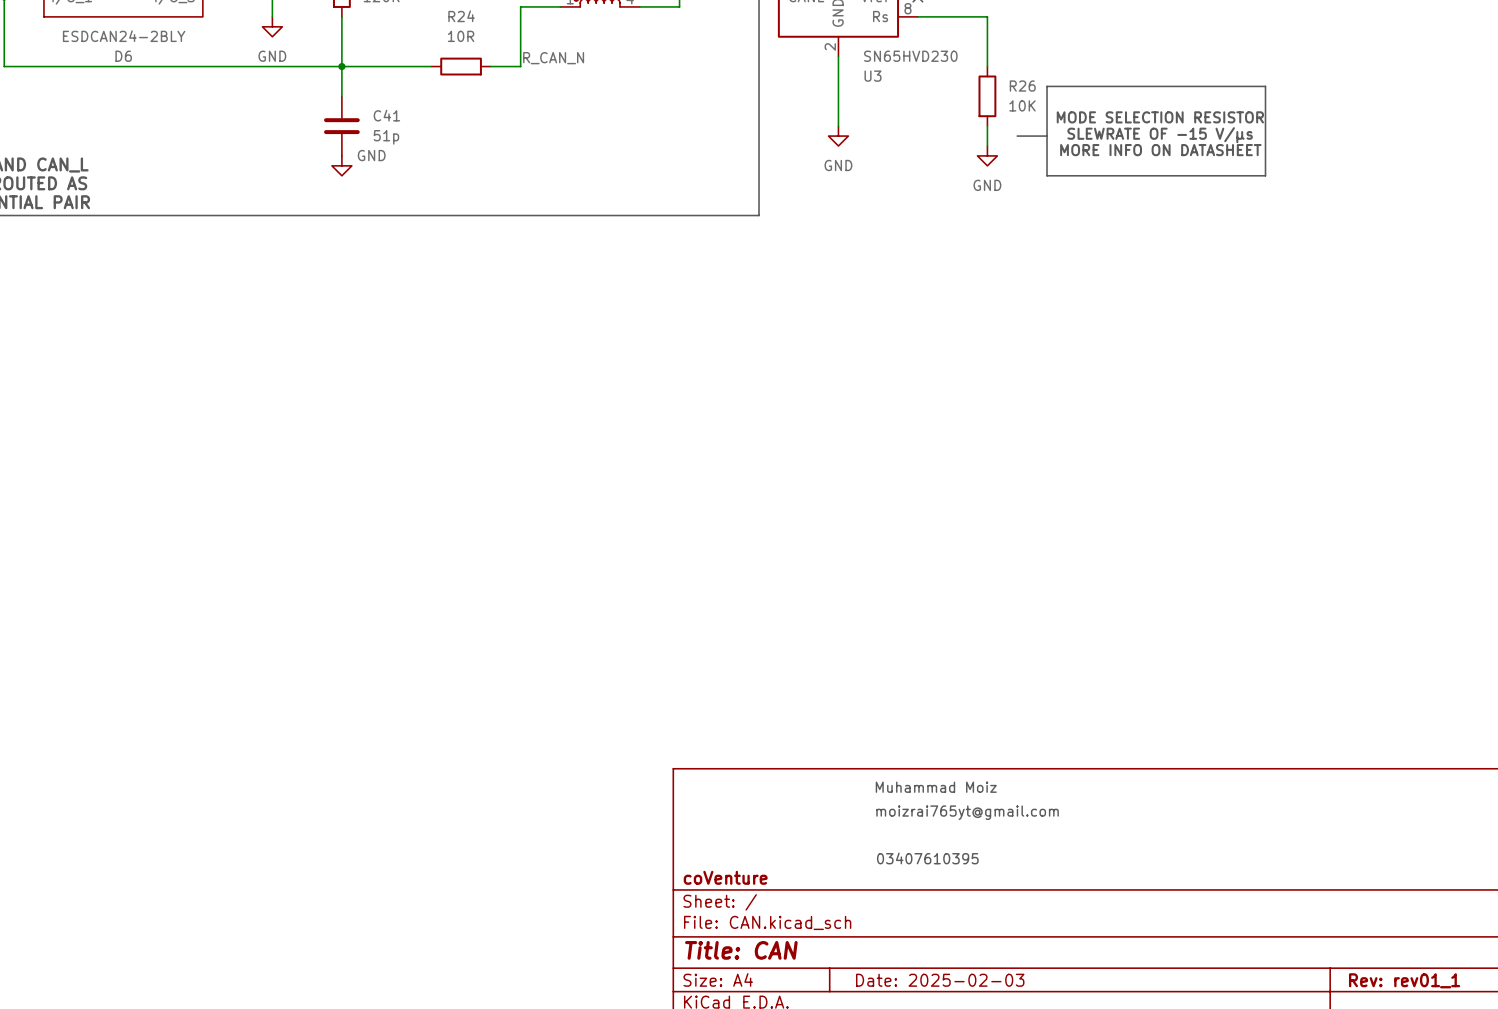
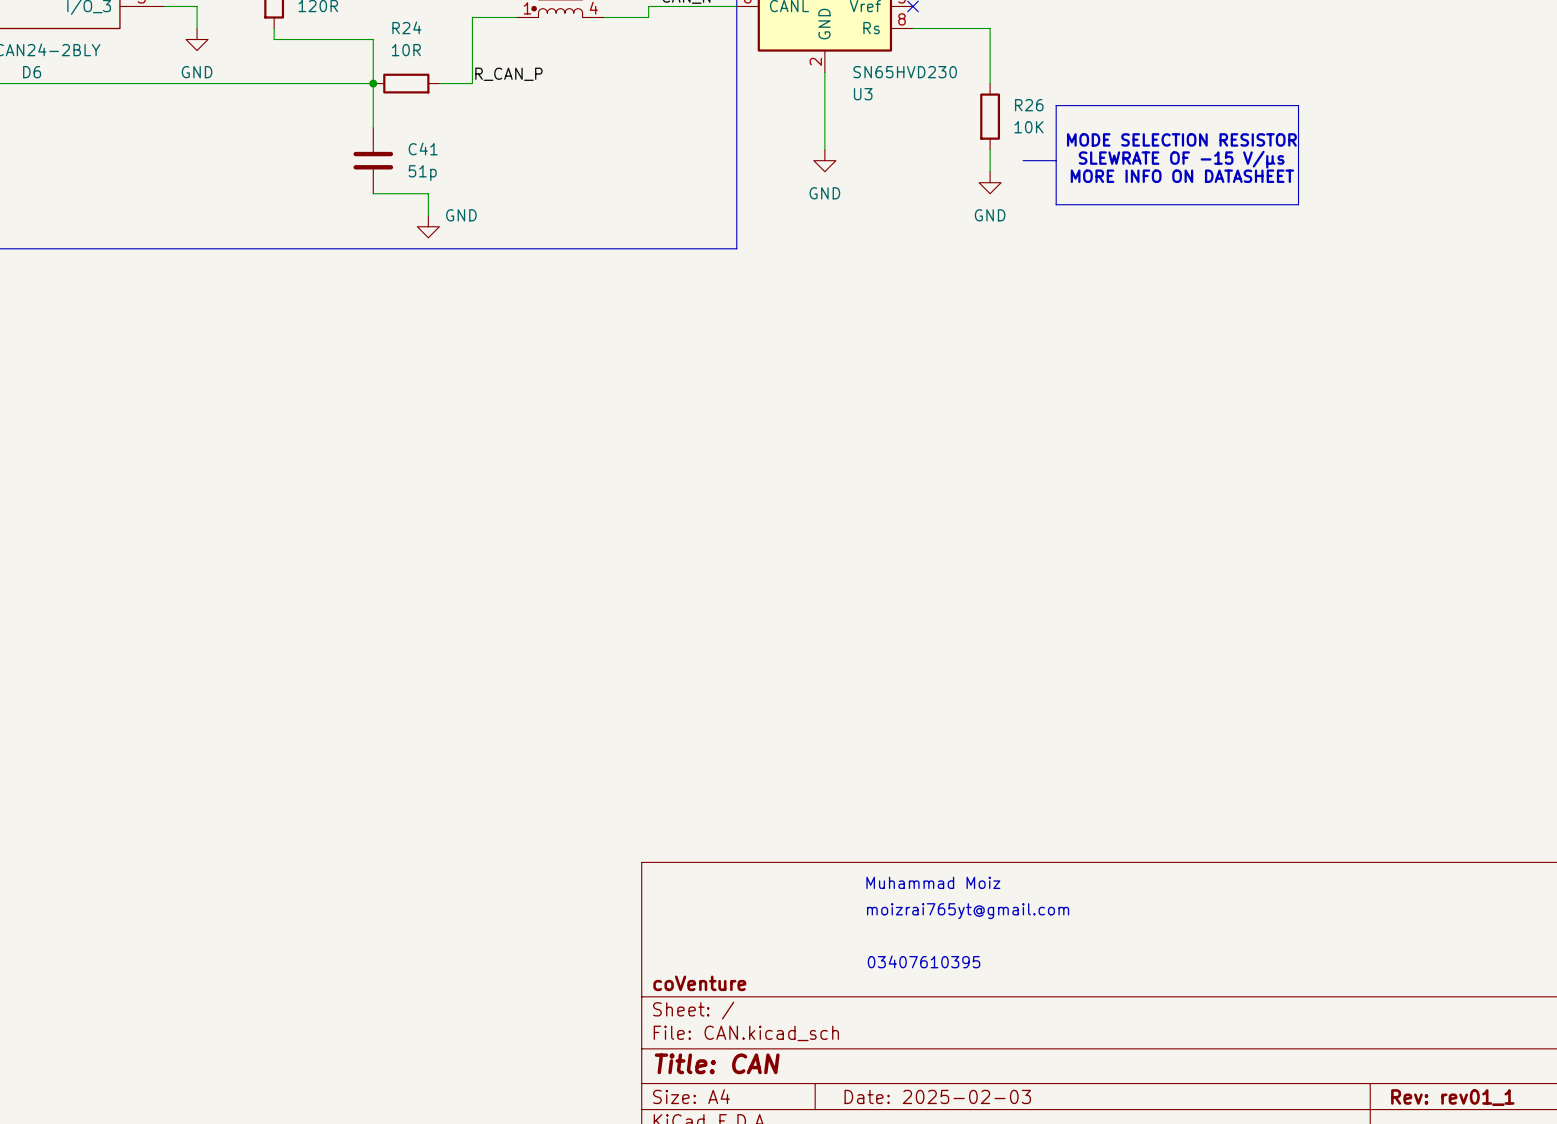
wire: (341, 26) (341, 96) -> (274, 39) (373, 39) (373, 127)
label: R_CAN_N (553, 58) -> R_CAN_P (508, 74)
junction: (341, 66) -> none
junction: none -> (373, 83)
C41 position: (341, 126) -> (373, 160)
power symbol position: GND (341, 165) -> GND (428, 226)
wire: none -> (373, 193) (428, 193) (428, 215)

